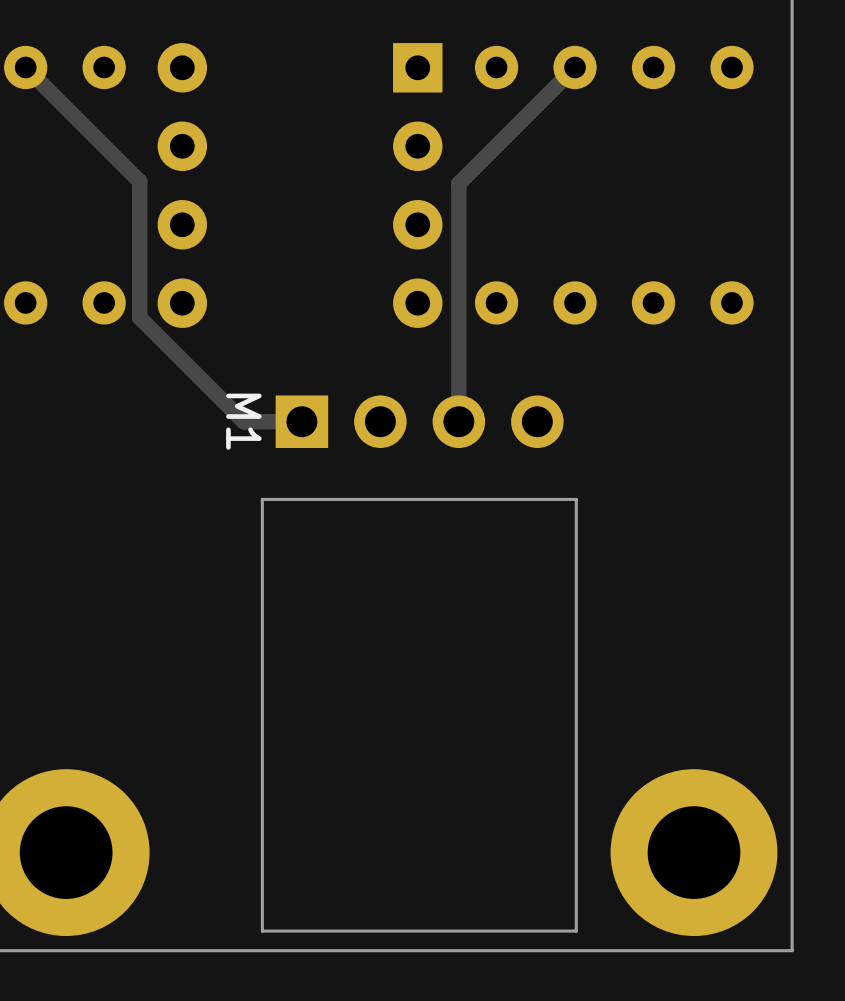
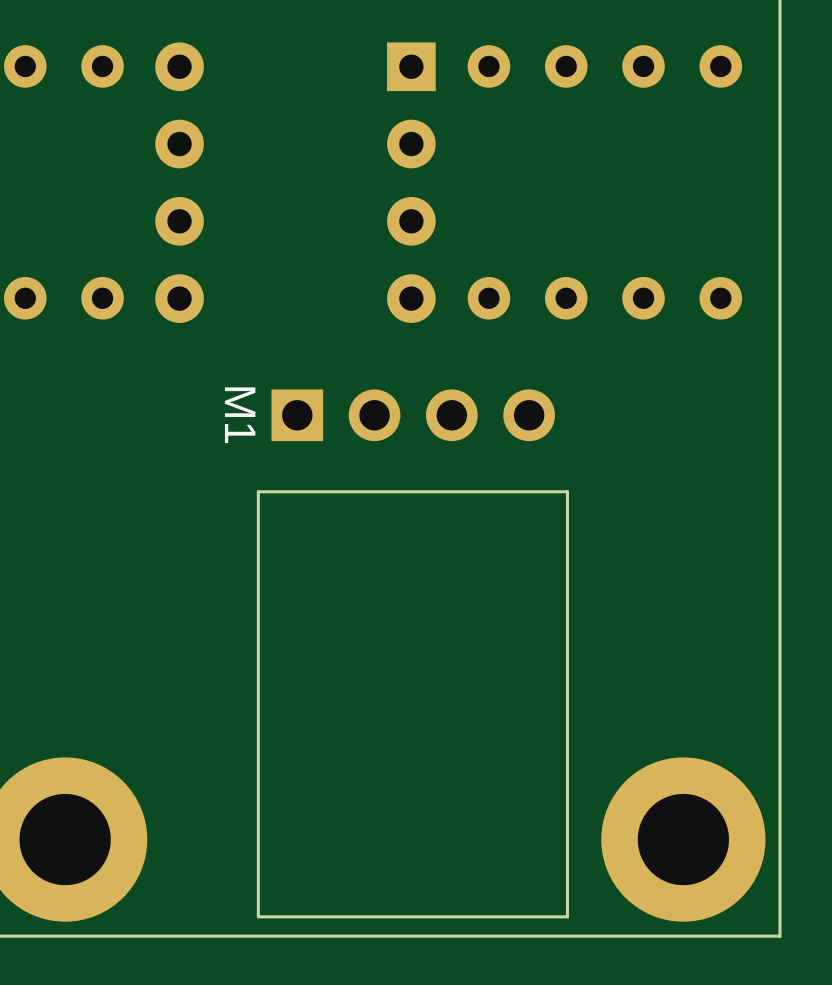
track: (25, 67) (139, 181) (139, 317) (243, 421) (301, 421) -> none
track: (575, 67) (458, 183) (458, 421) -> none

